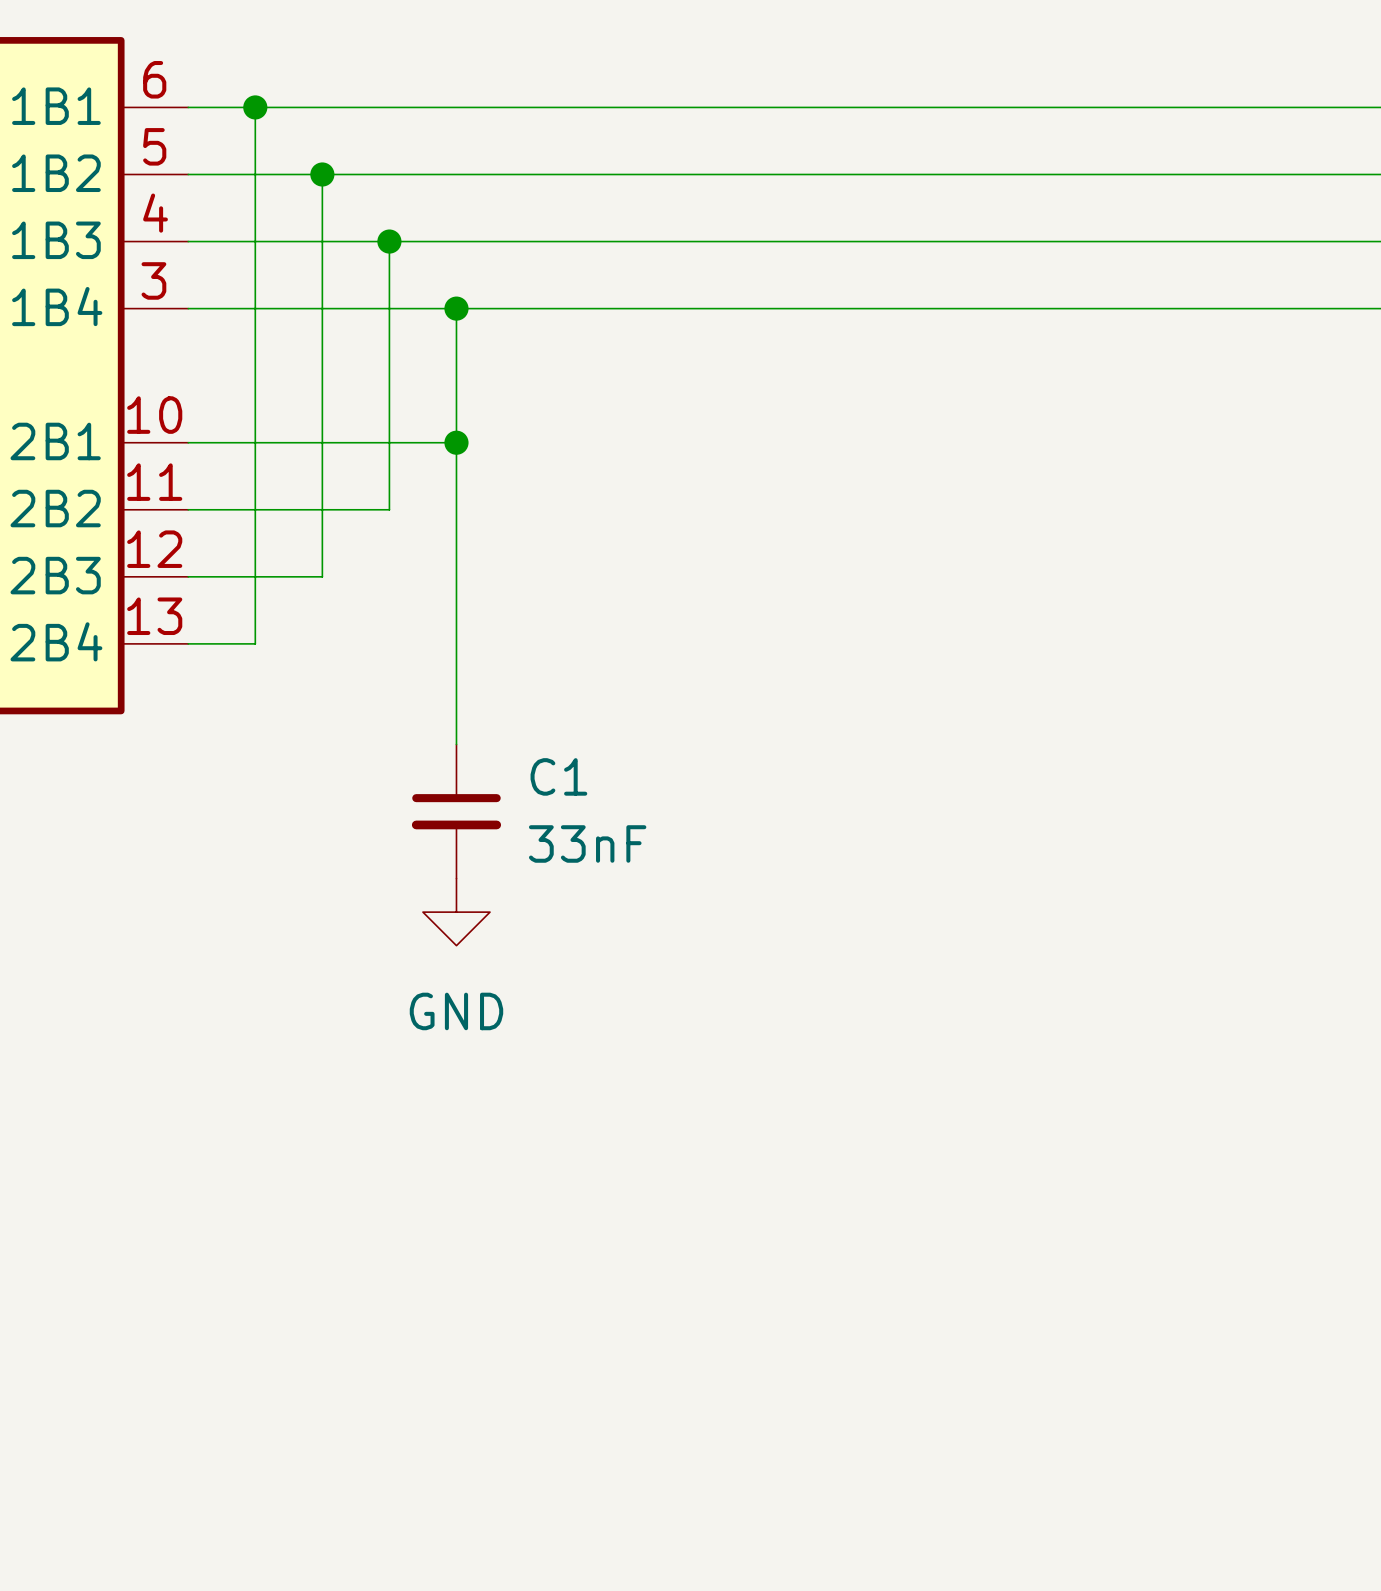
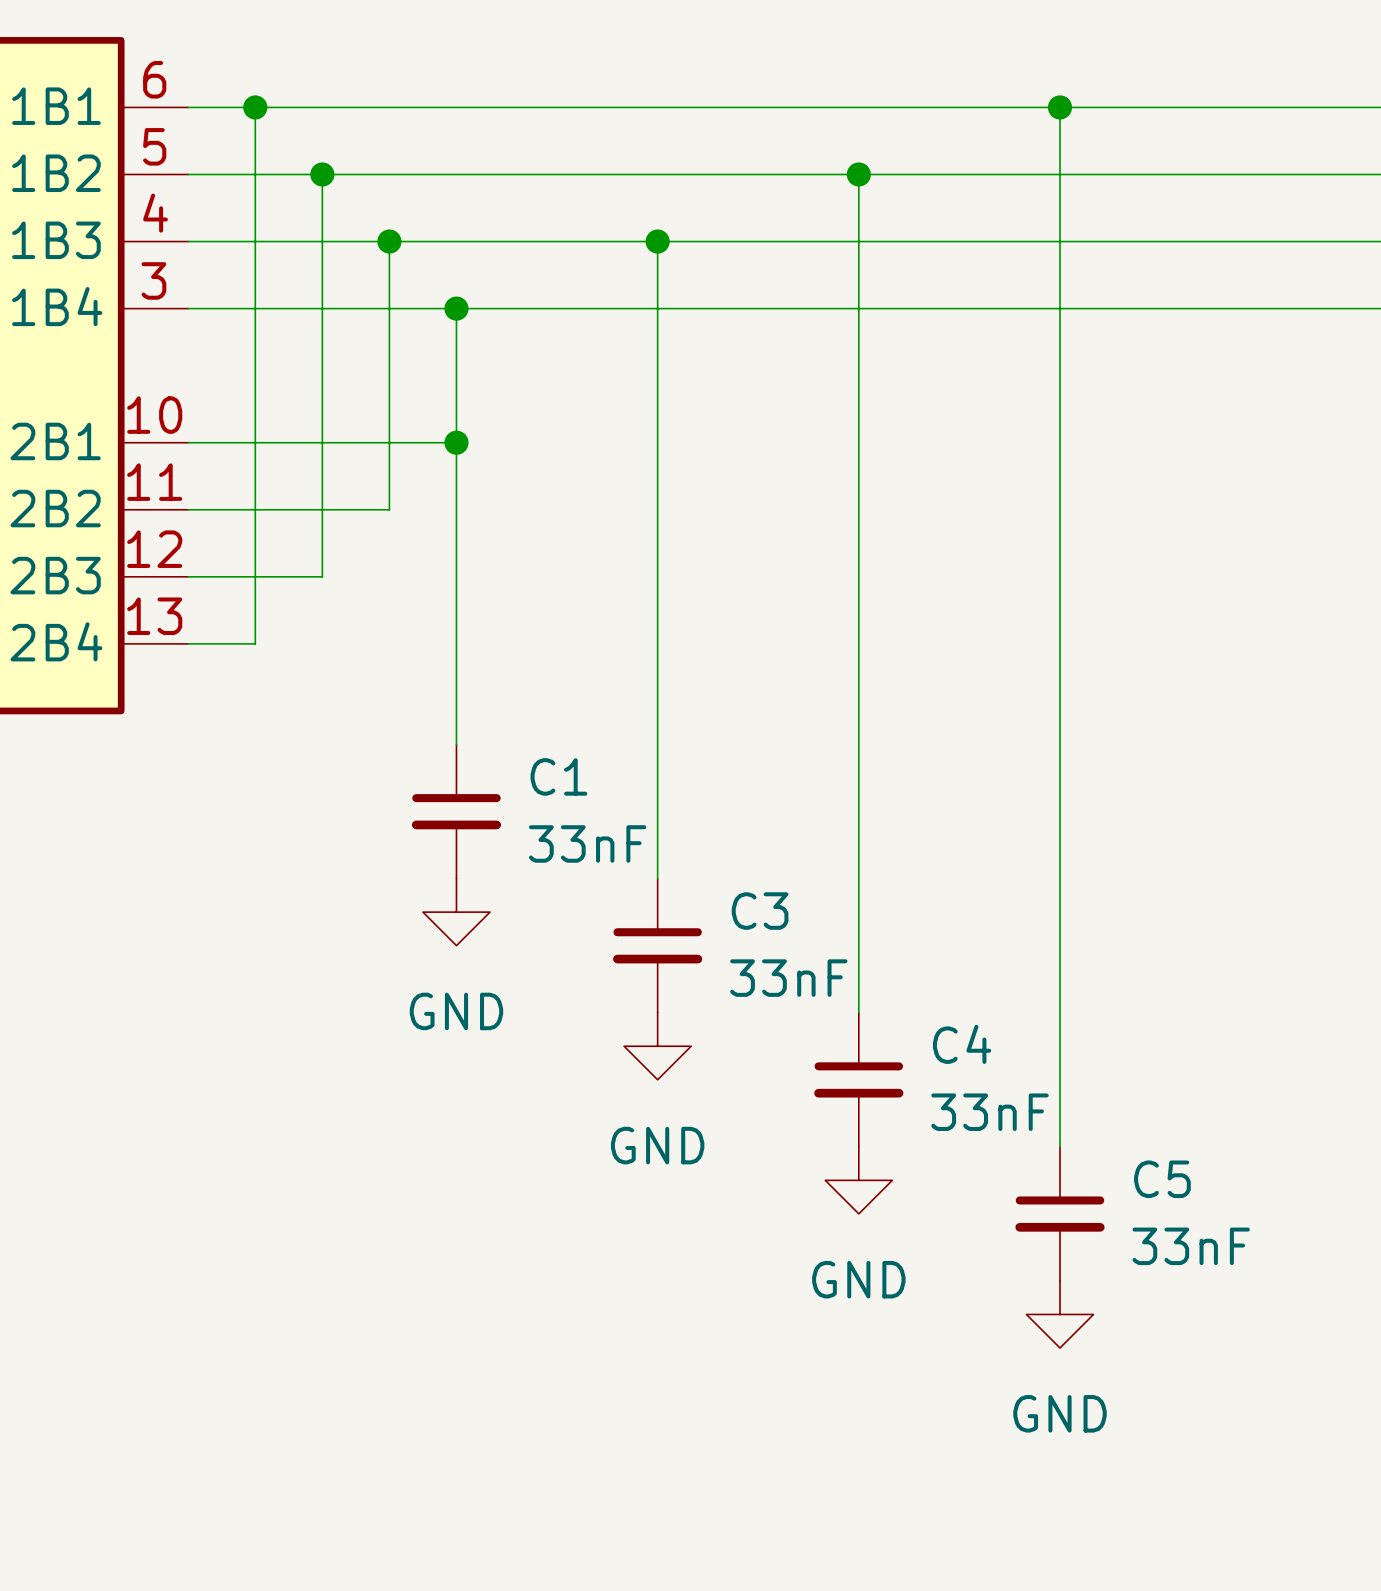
wire: none -> (1059, 107) (1059, 1146)
junction: none -> (1059, 107)
wire: none -> (858, 174) (858, 1012)
junction: none -> (858, 174)
wire: none -> (657, 241) (657, 878)
junction: none -> (657, 241)
C3: none -> 33nF (657, 945)
power symbol: none -> GND (657, 1046)
C4: none -> 33nF (858, 1079)
power symbol: none -> GND (858, 1180)
C5: none -> 33nF (1059, 1213)
power symbol: none -> GND (1059, 1314)

